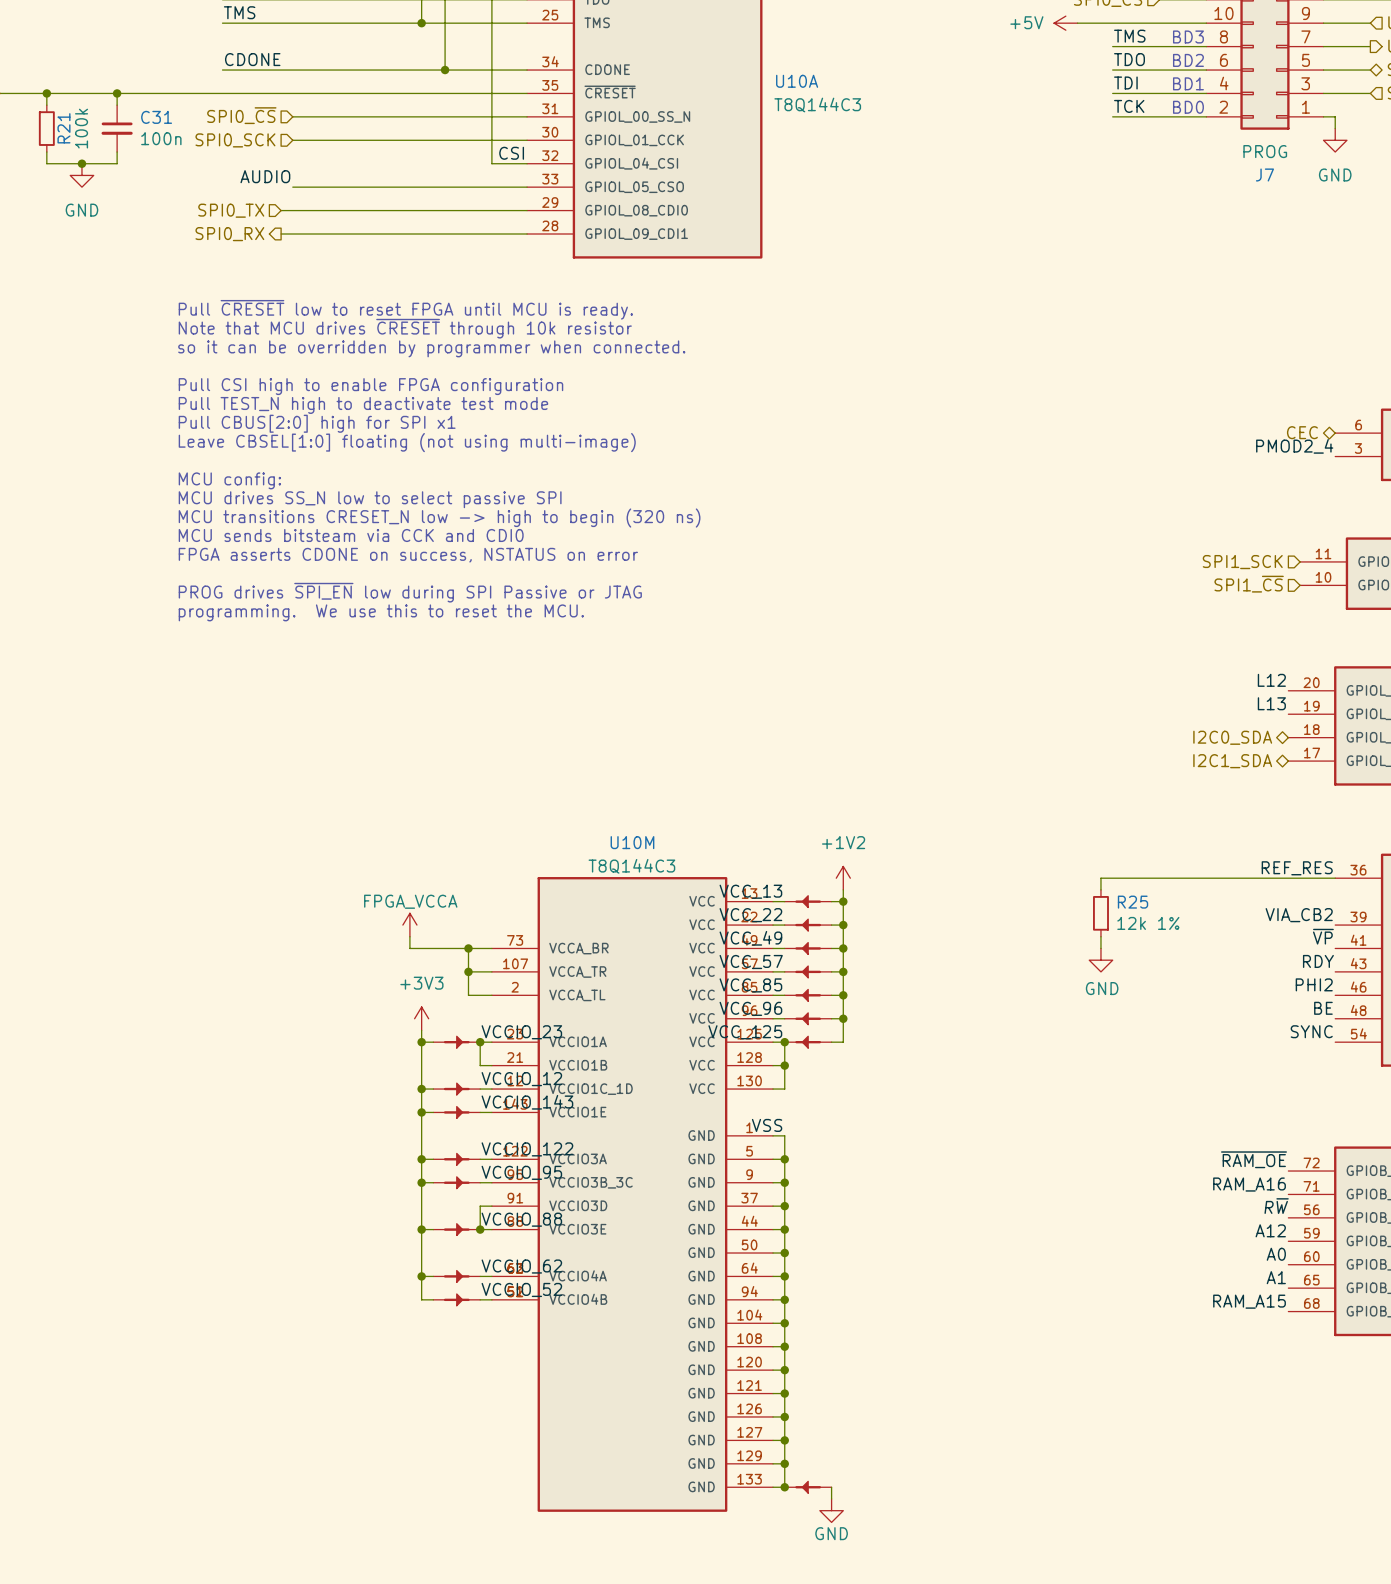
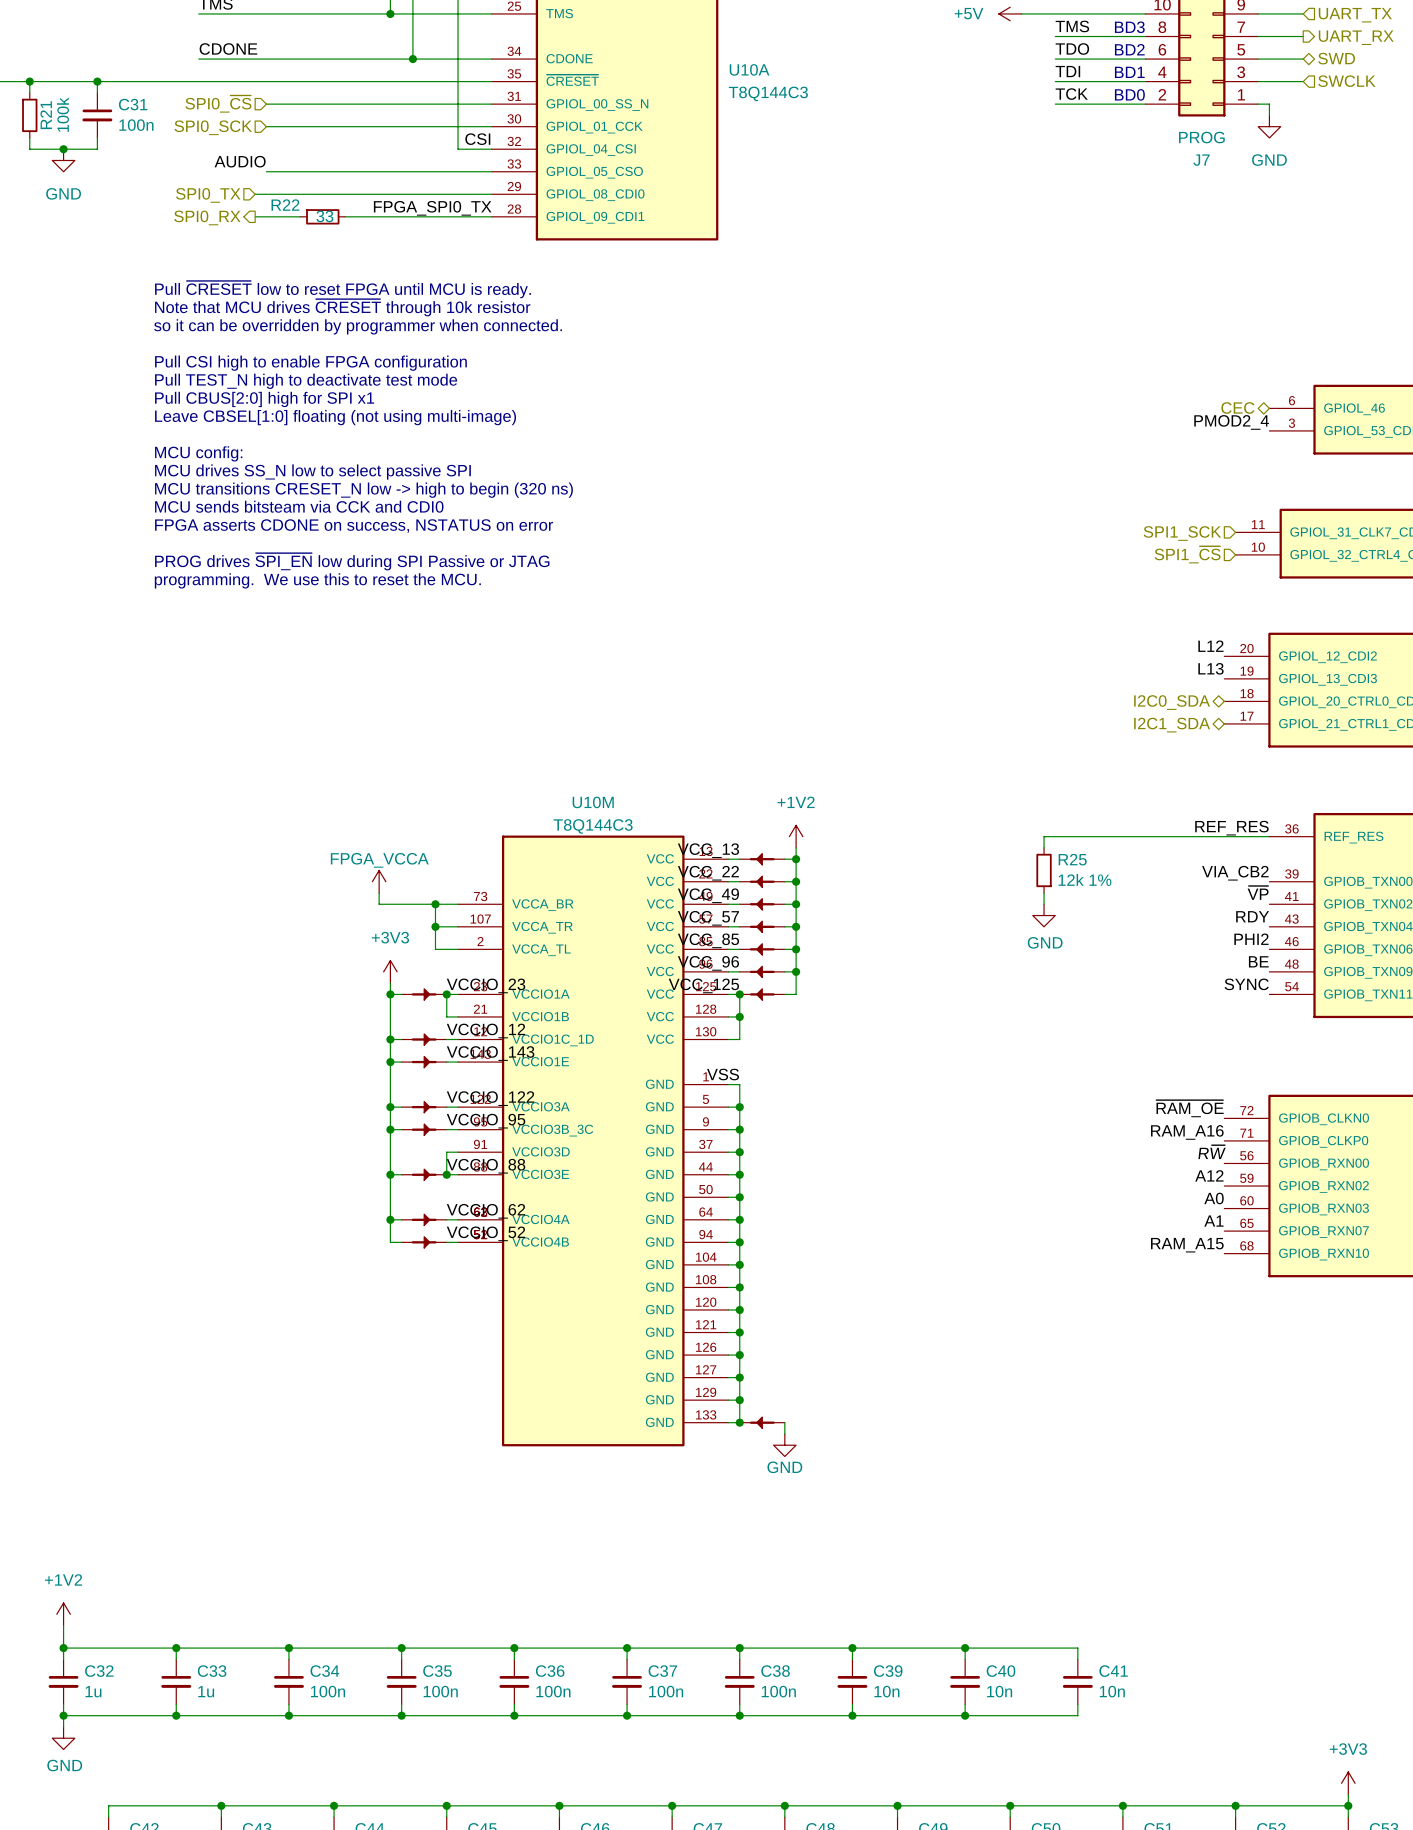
label: none -> FPGA_SPI0_TX (432, 208)
wire: (327, 234) (374, 234) -> none
R22: none -> 33 (322, 216)

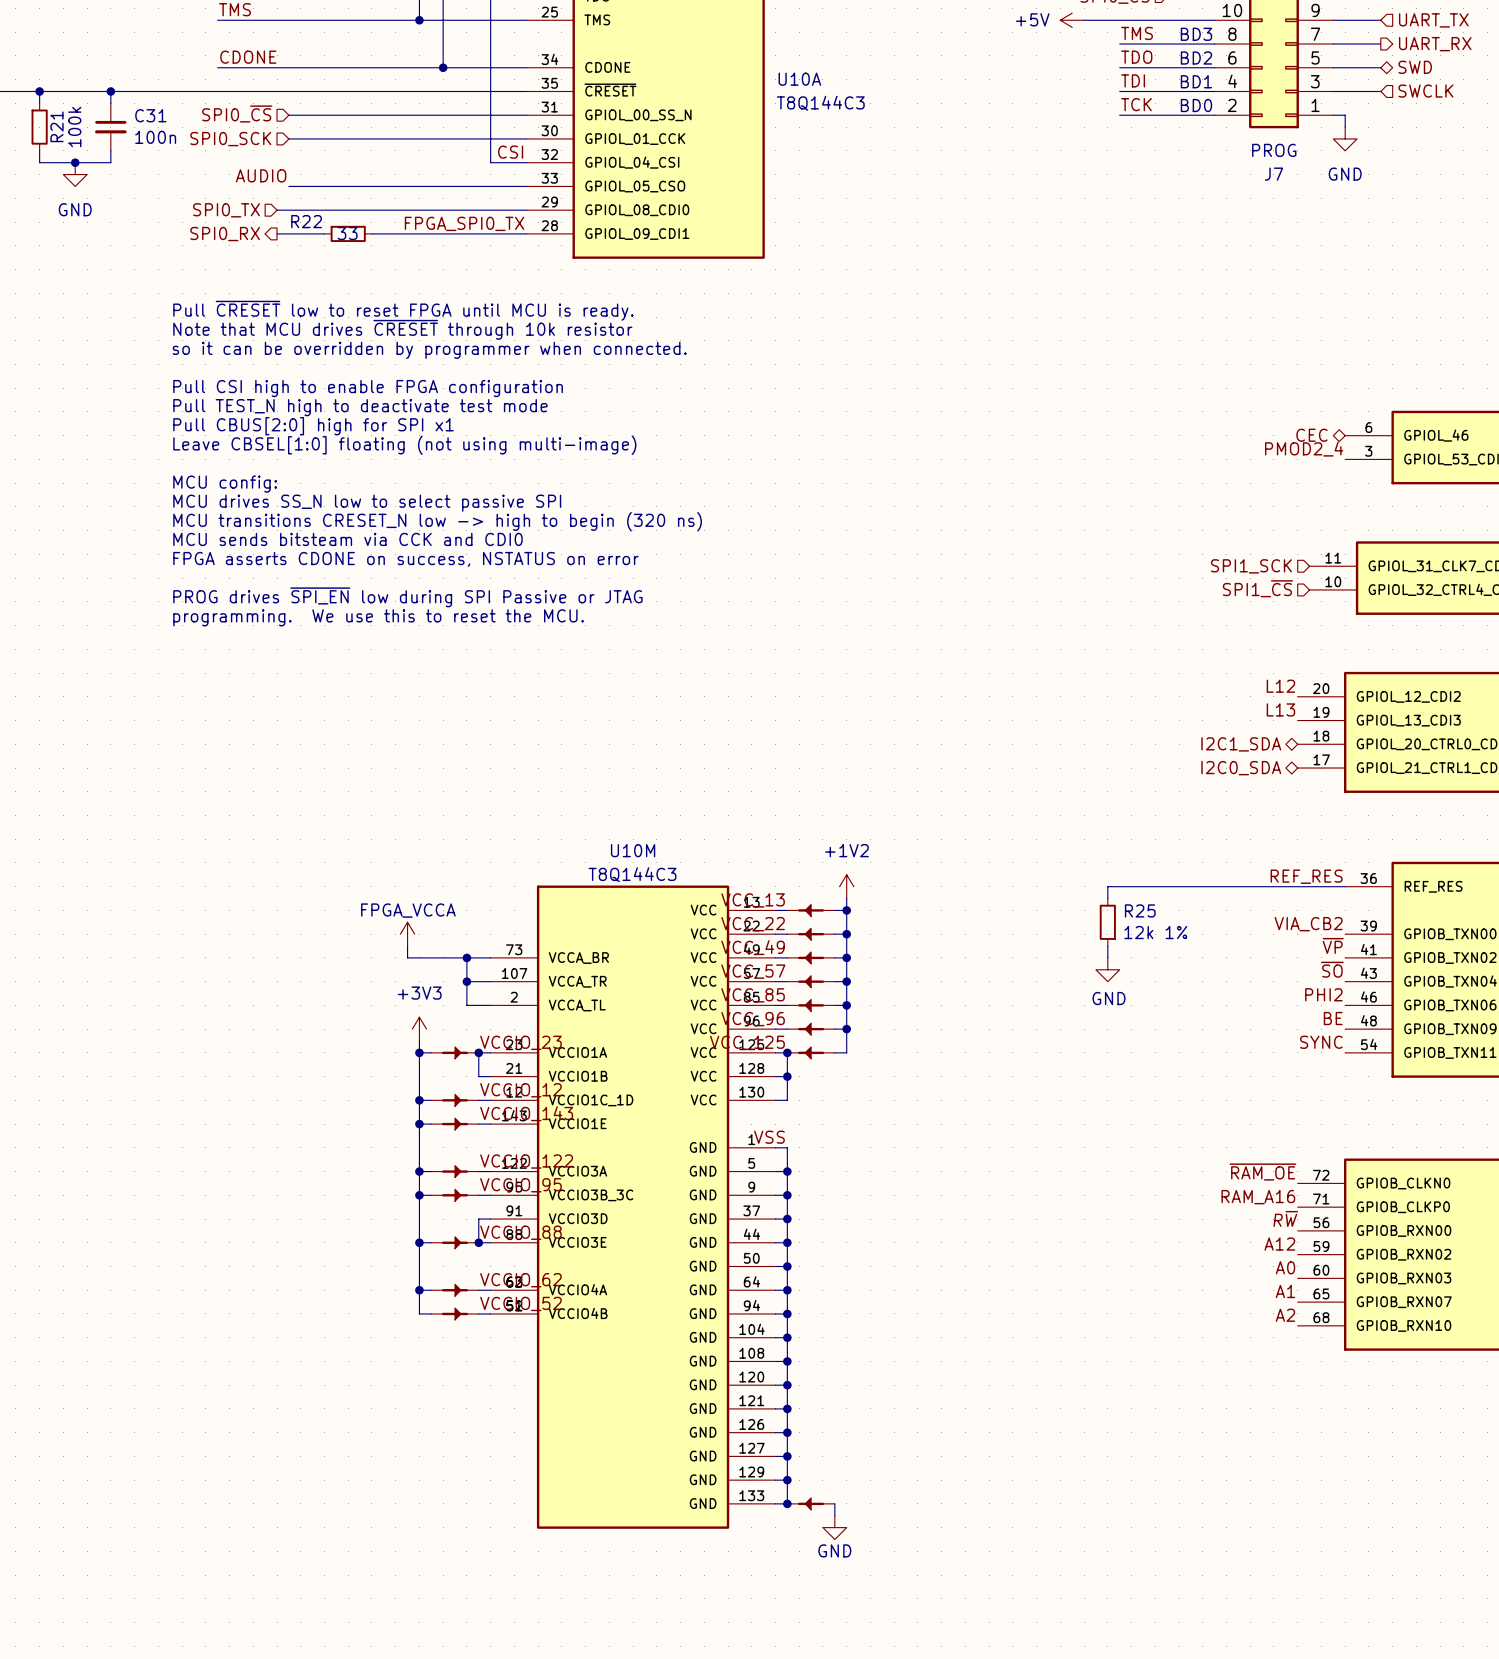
hierarchical label: I2C0_SDA (1172, 702) -> I2C1_SDA (1241, 744)
hierarchical label: I2C1_SDA (1172, 725) -> I2C0_SDA (1241, 768)
label: RDY (1252, 916) -> ~{SO} (1332, 969)
label: RAM_A15 (1187, 1245) -> A2 (1285, 1315)

